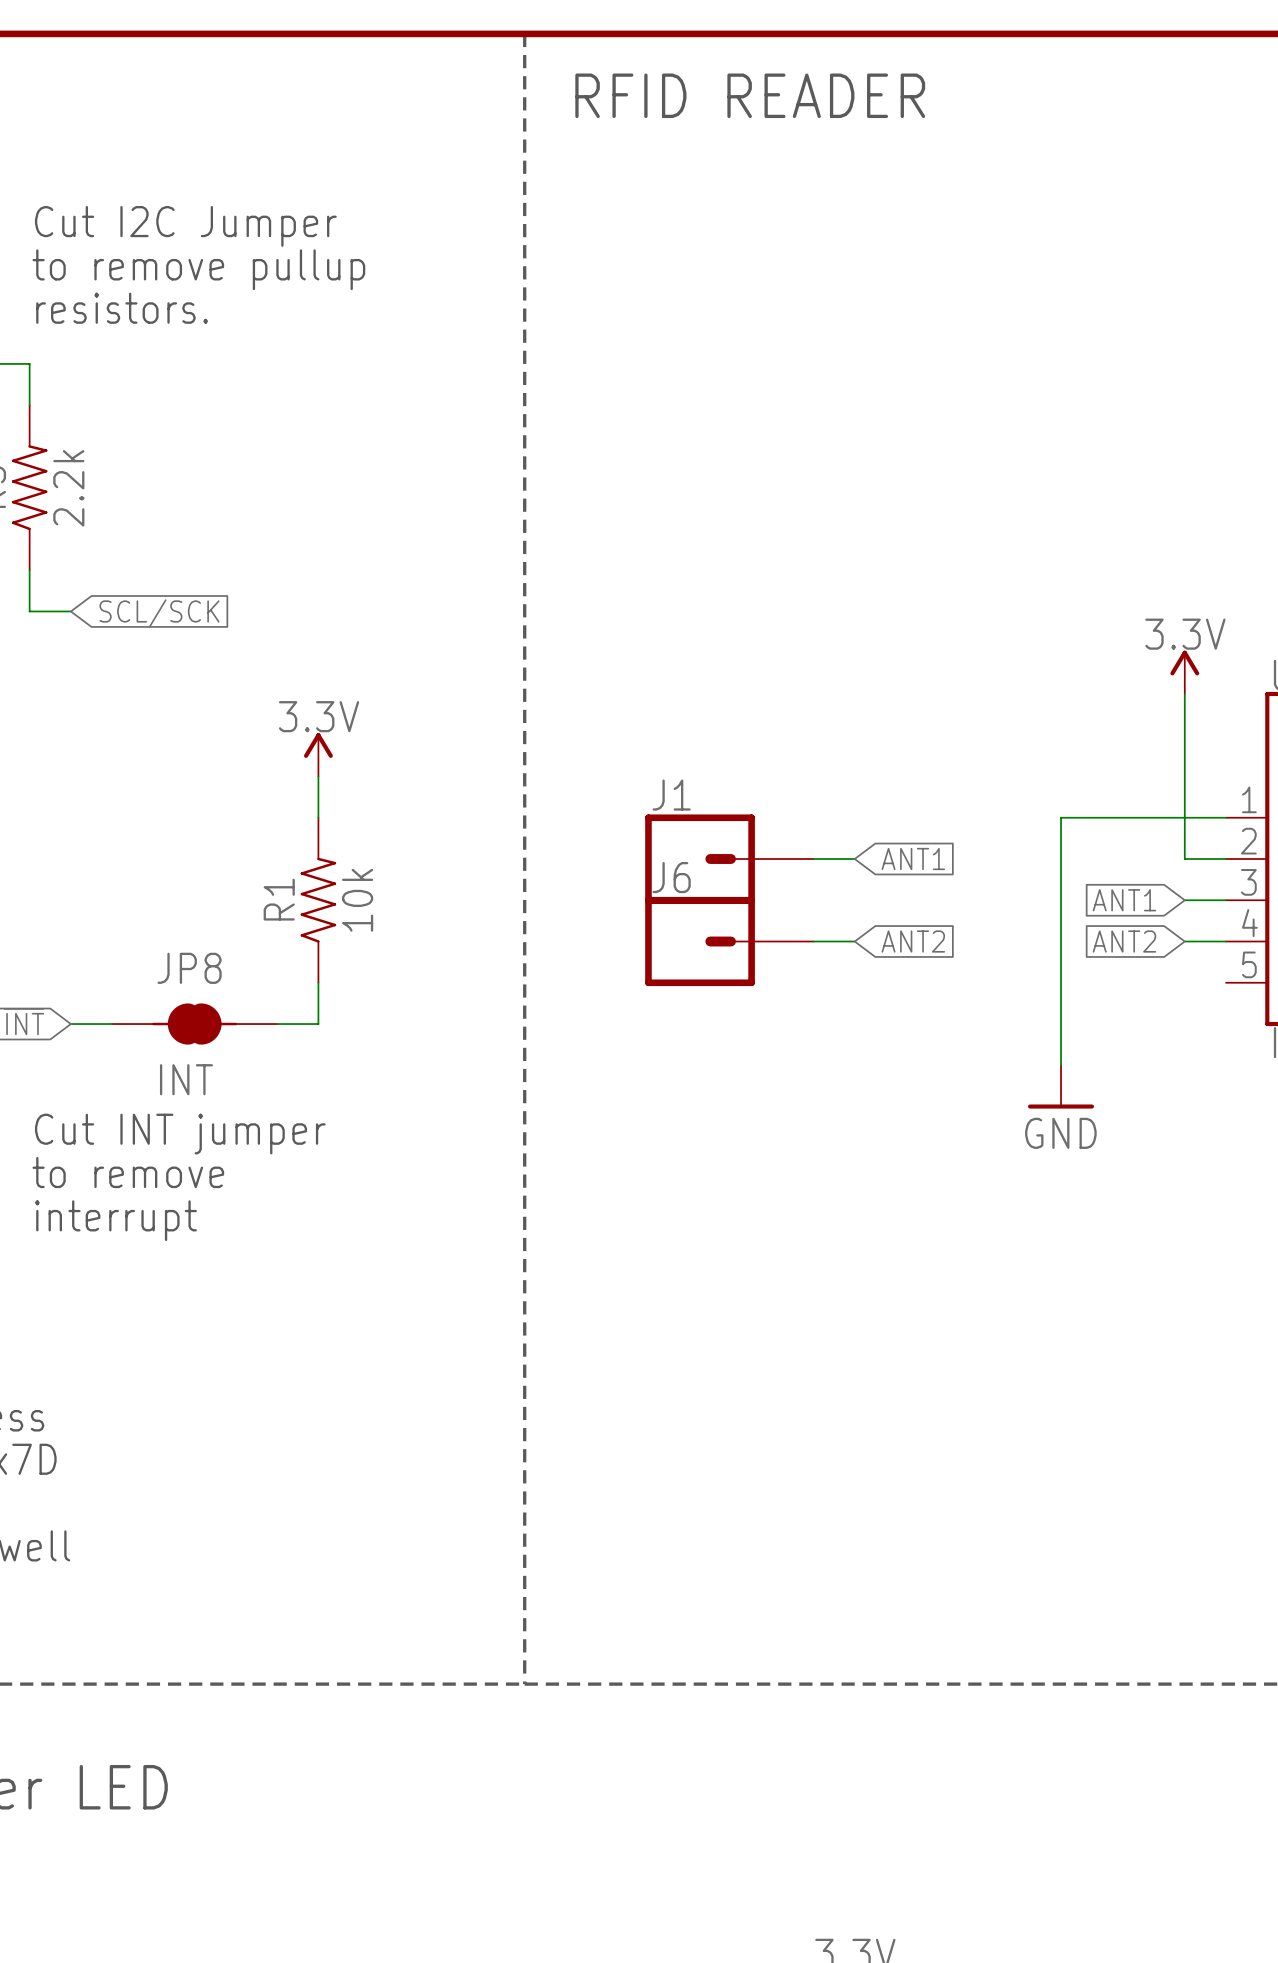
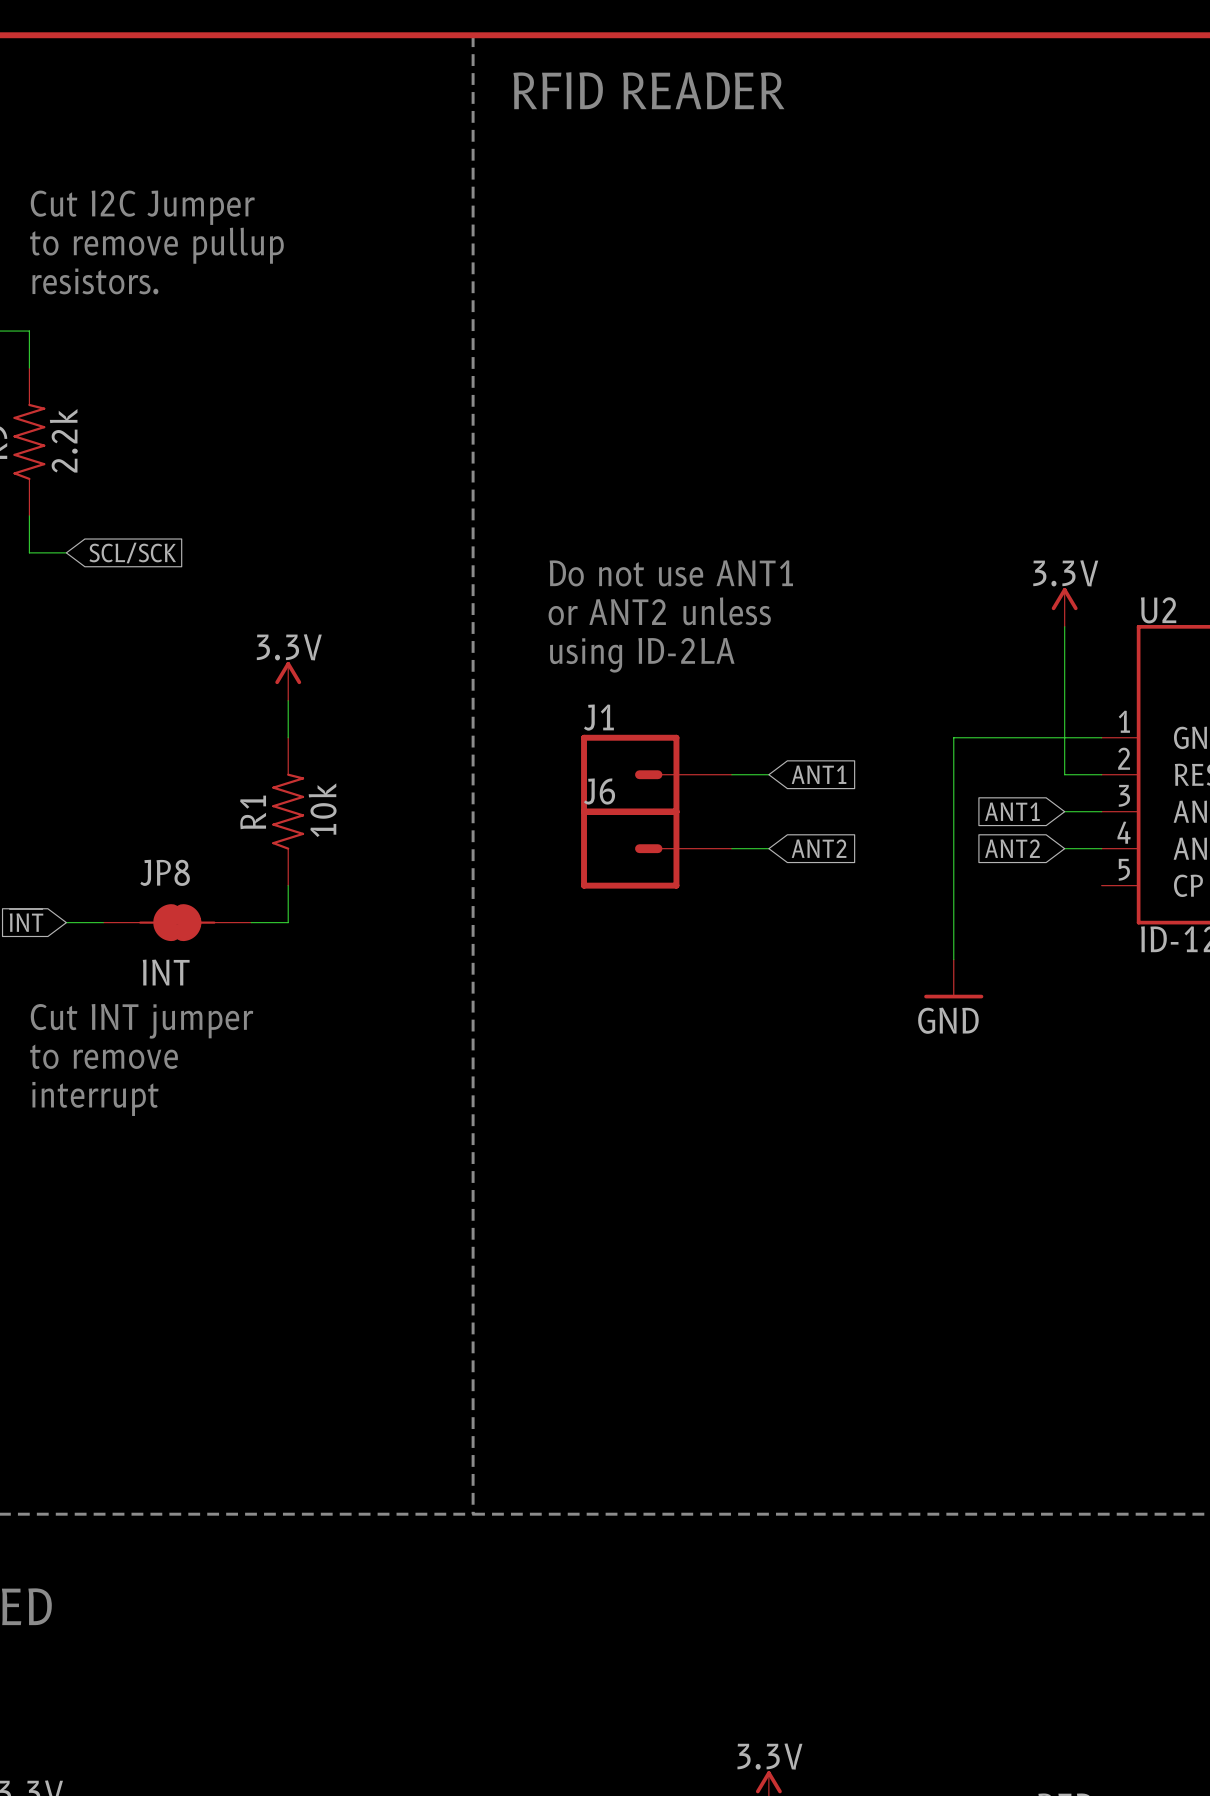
text: none -> Do not use ANT1 (671, 573)
text: none -> or ANT2 unless (659, 611)
text: none -> using ID-2LA (642, 655)

